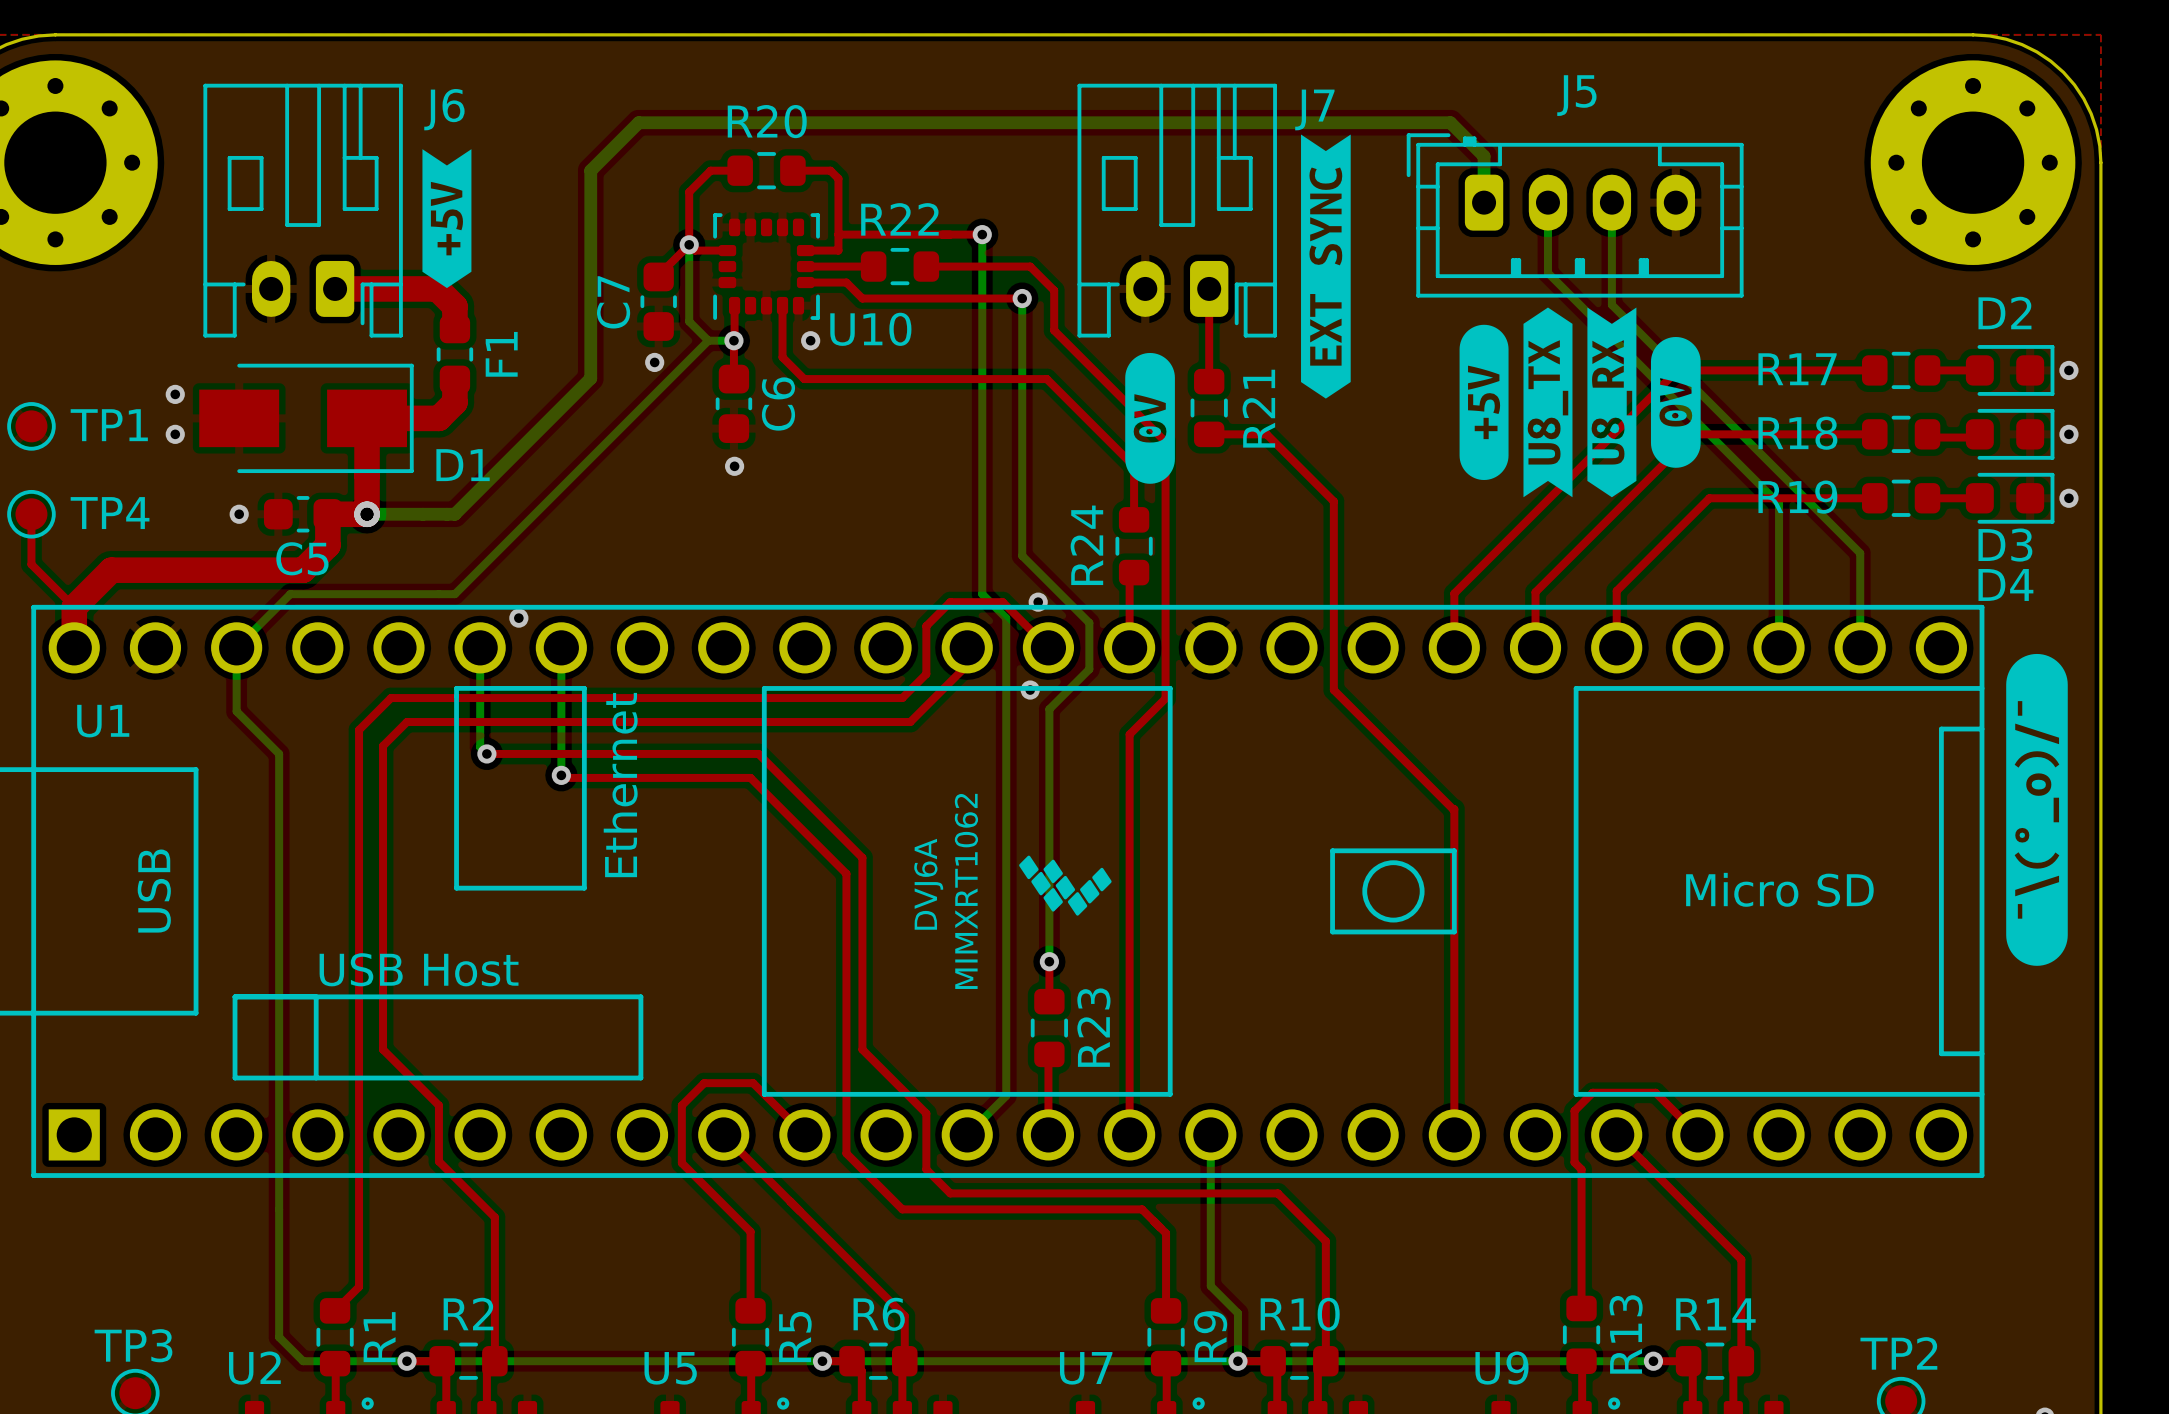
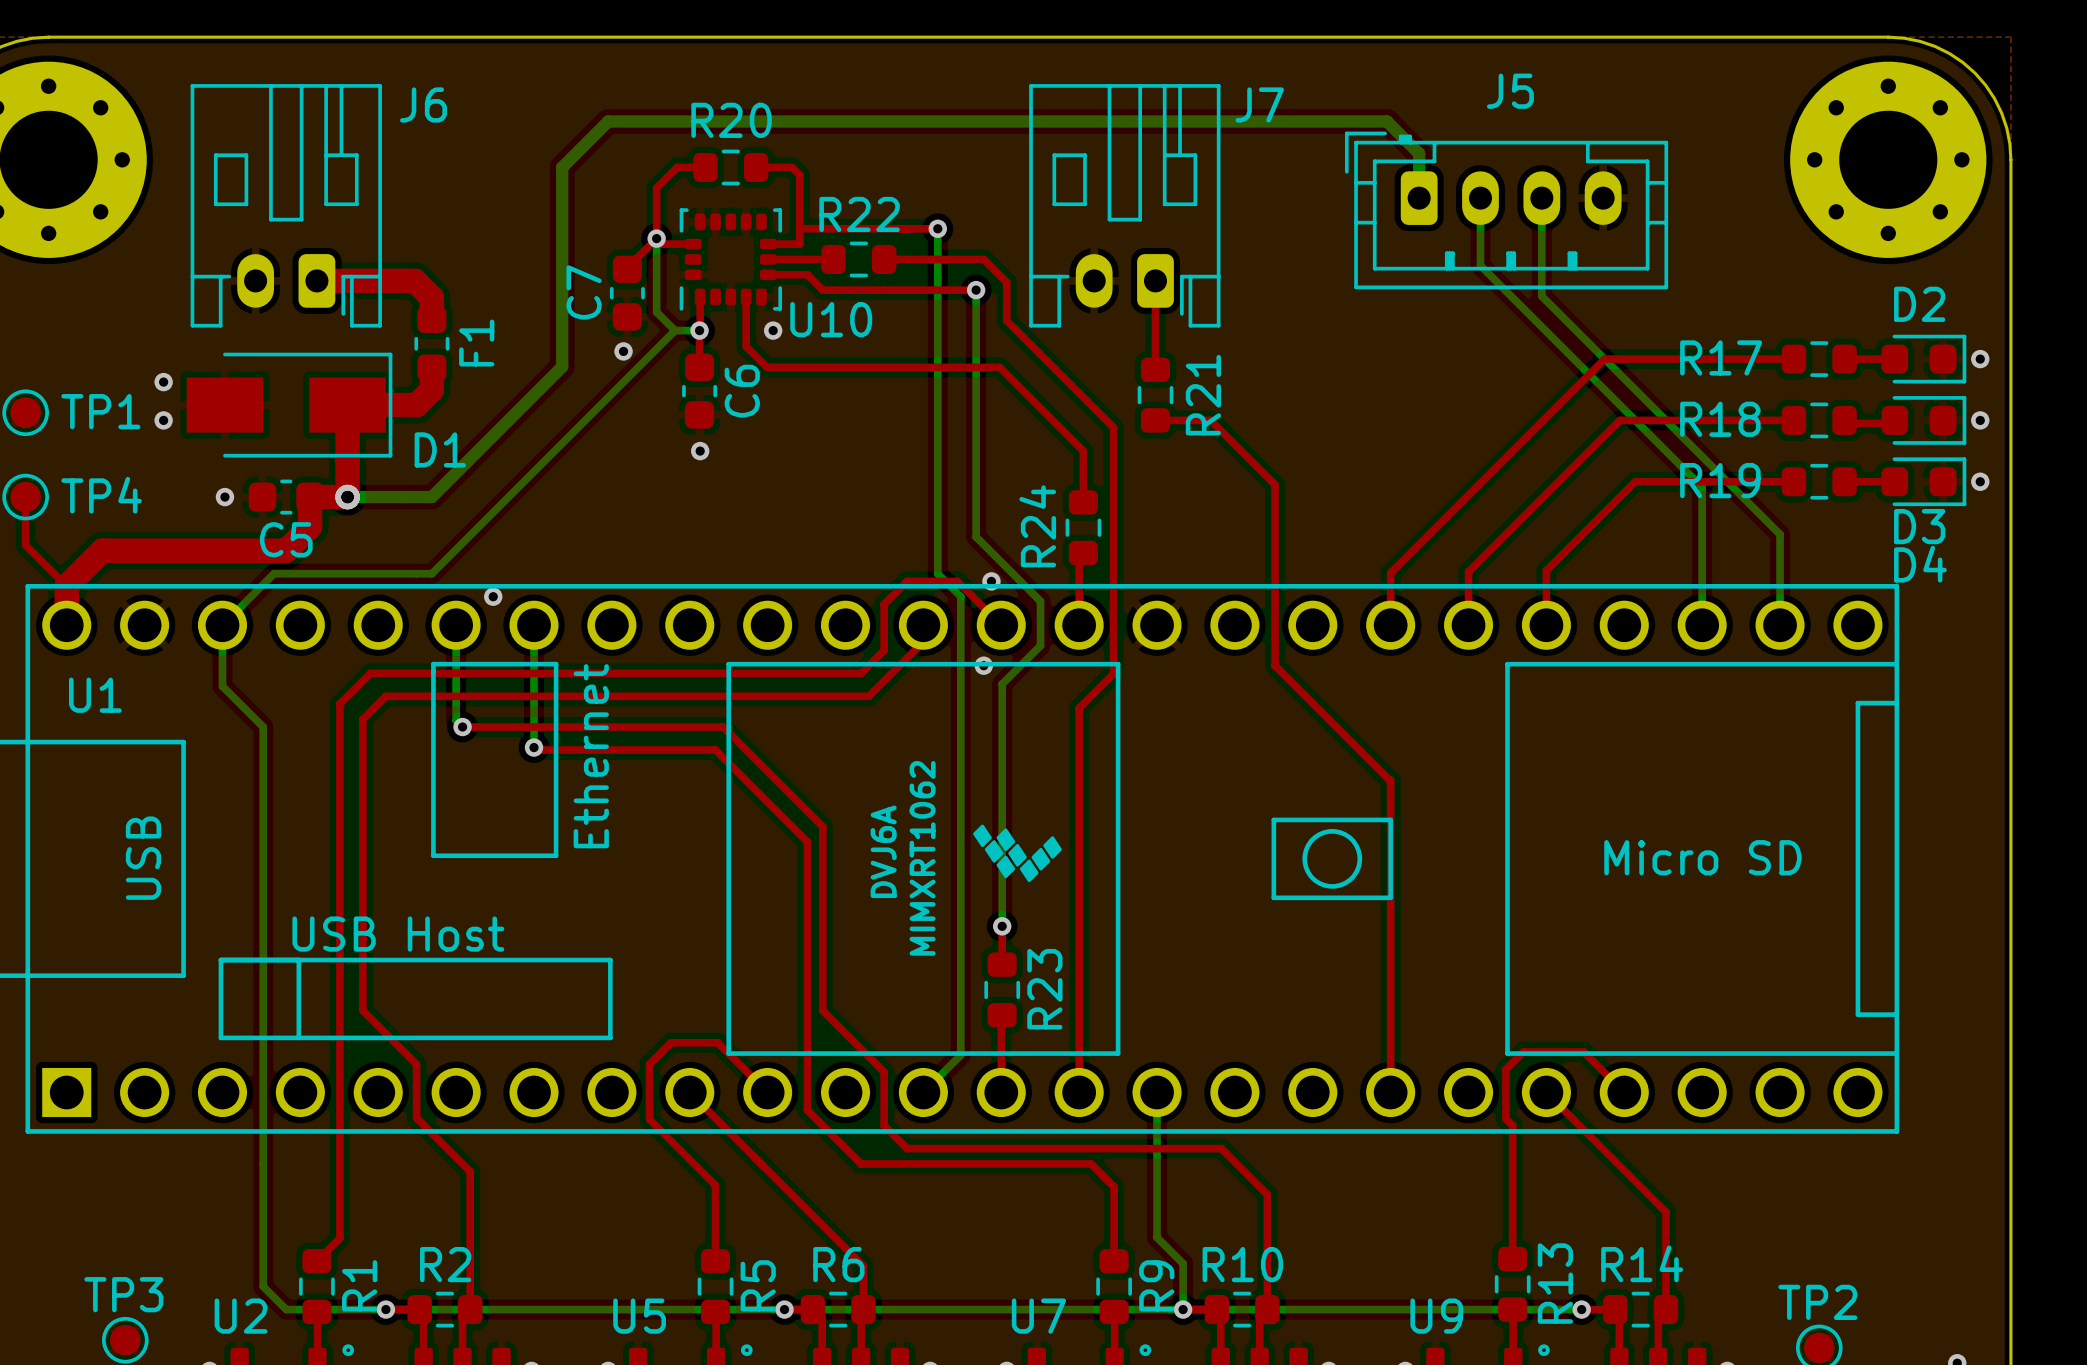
drawing: [1301, 134, 1351, 399] -> none
drawing: [422, 149, 472, 289] -> none
drawing: [1459, 307, 1701, 498] -> none
drawing: [1125, 352, 1175, 484] -> none
drawing: [2006, 653, 2068, 966] -> none

